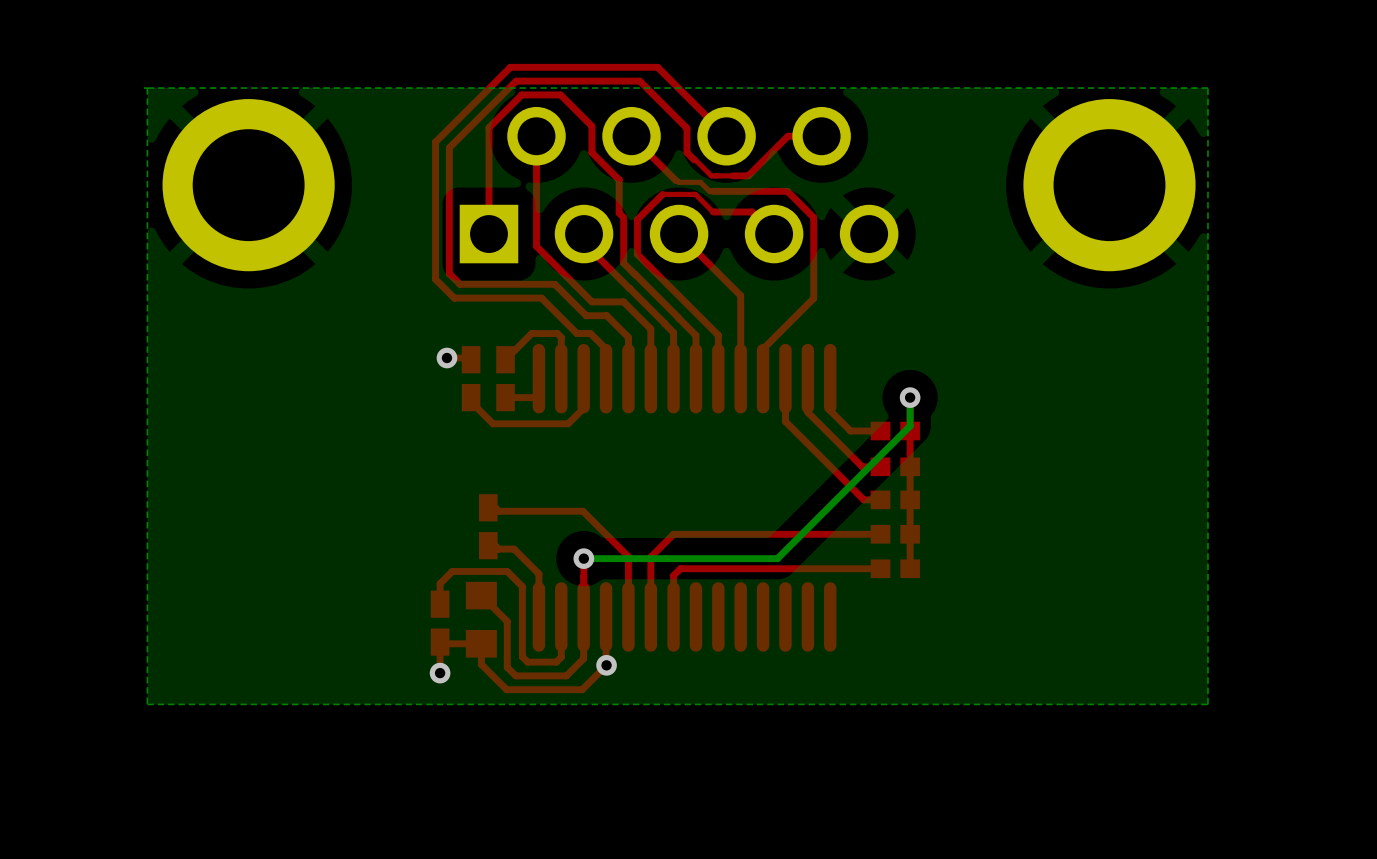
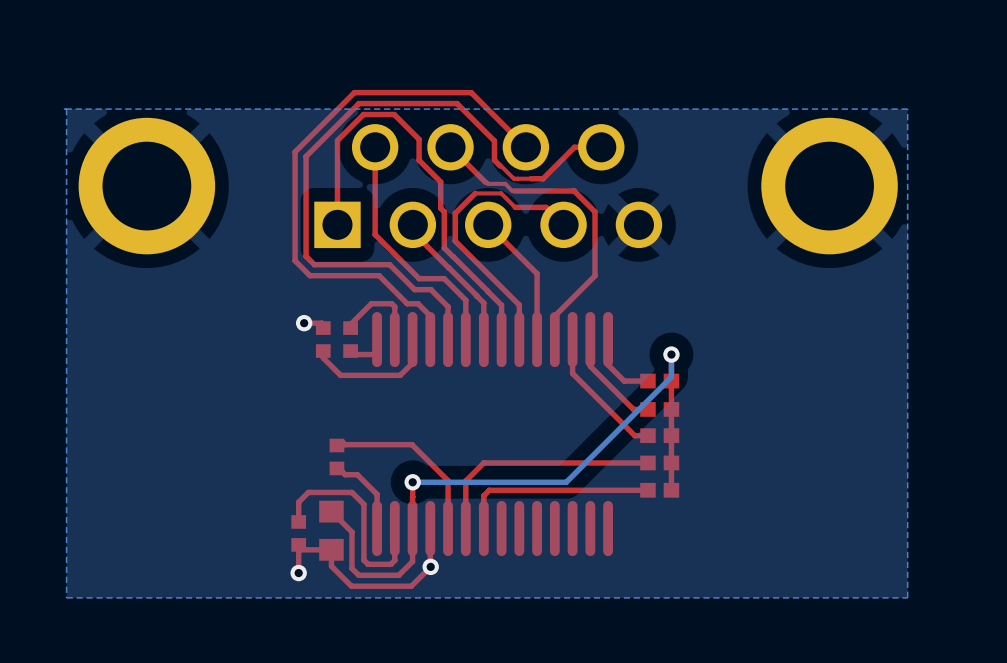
part footprint: [461, 346, 481, 412] -> [315, 321, 331, 358]
part footprint: [496, 346, 515, 412] -> [343, 321, 358, 358]
part footprint: [479, 494, 498, 560] -> [329, 438, 345, 476]
part footprint: [430, 590, 450, 656] -> [291, 515, 307, 552]

